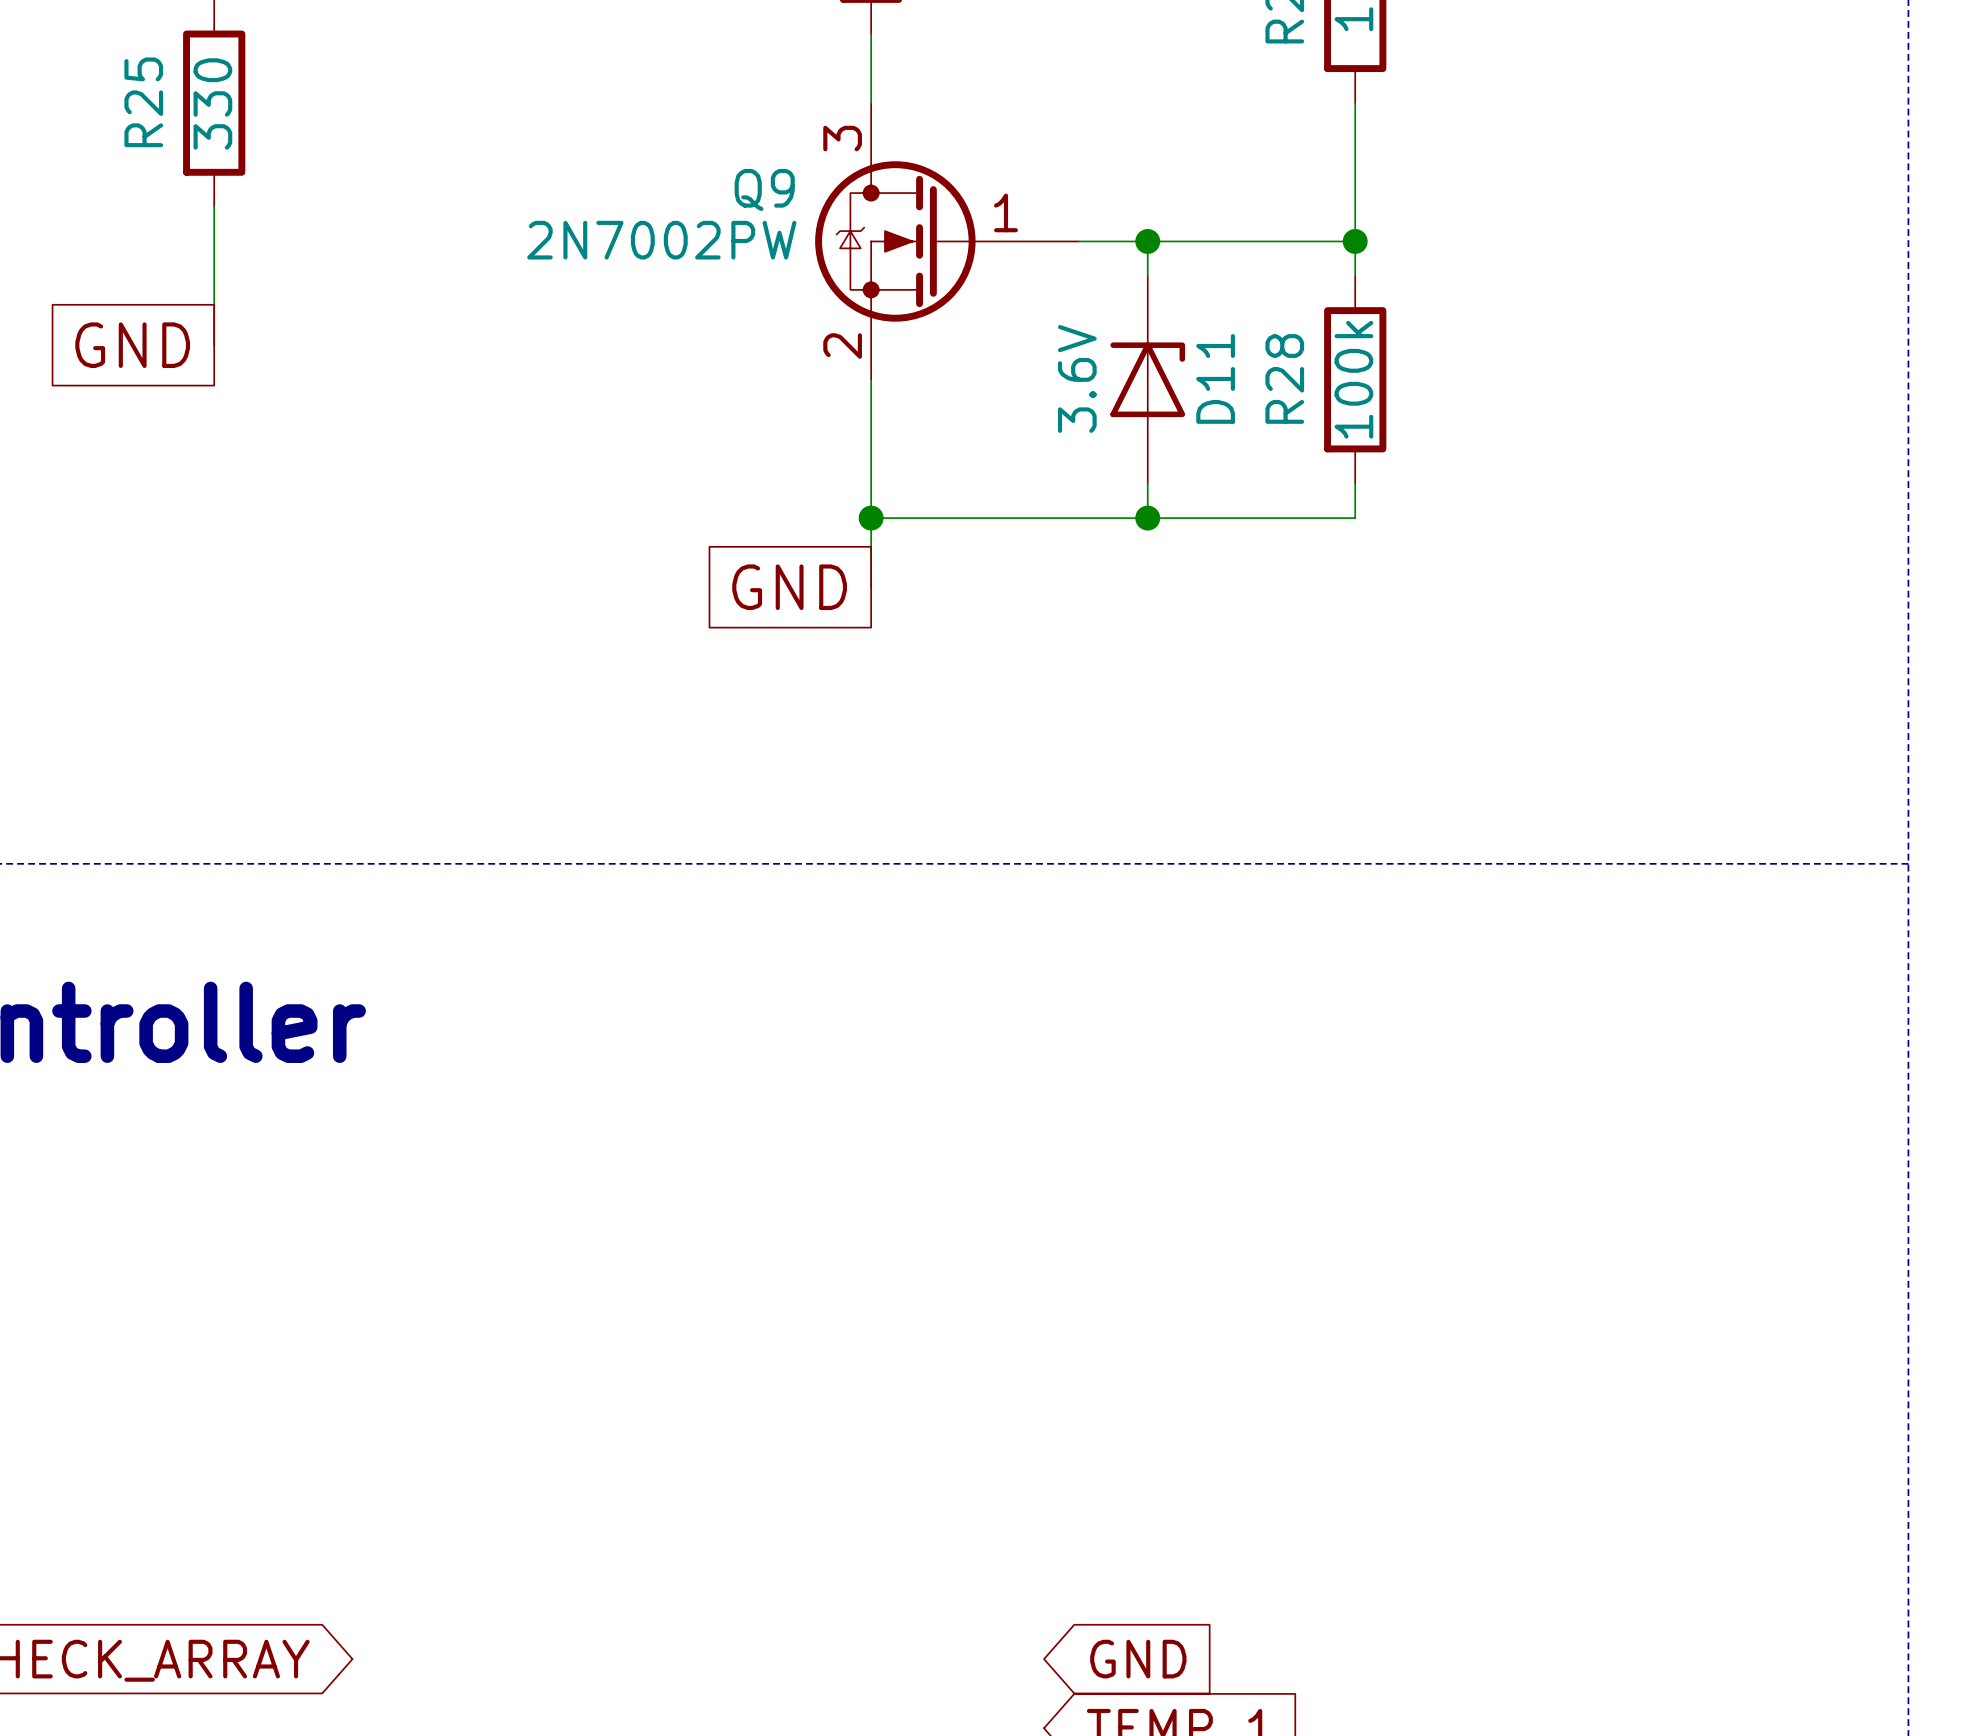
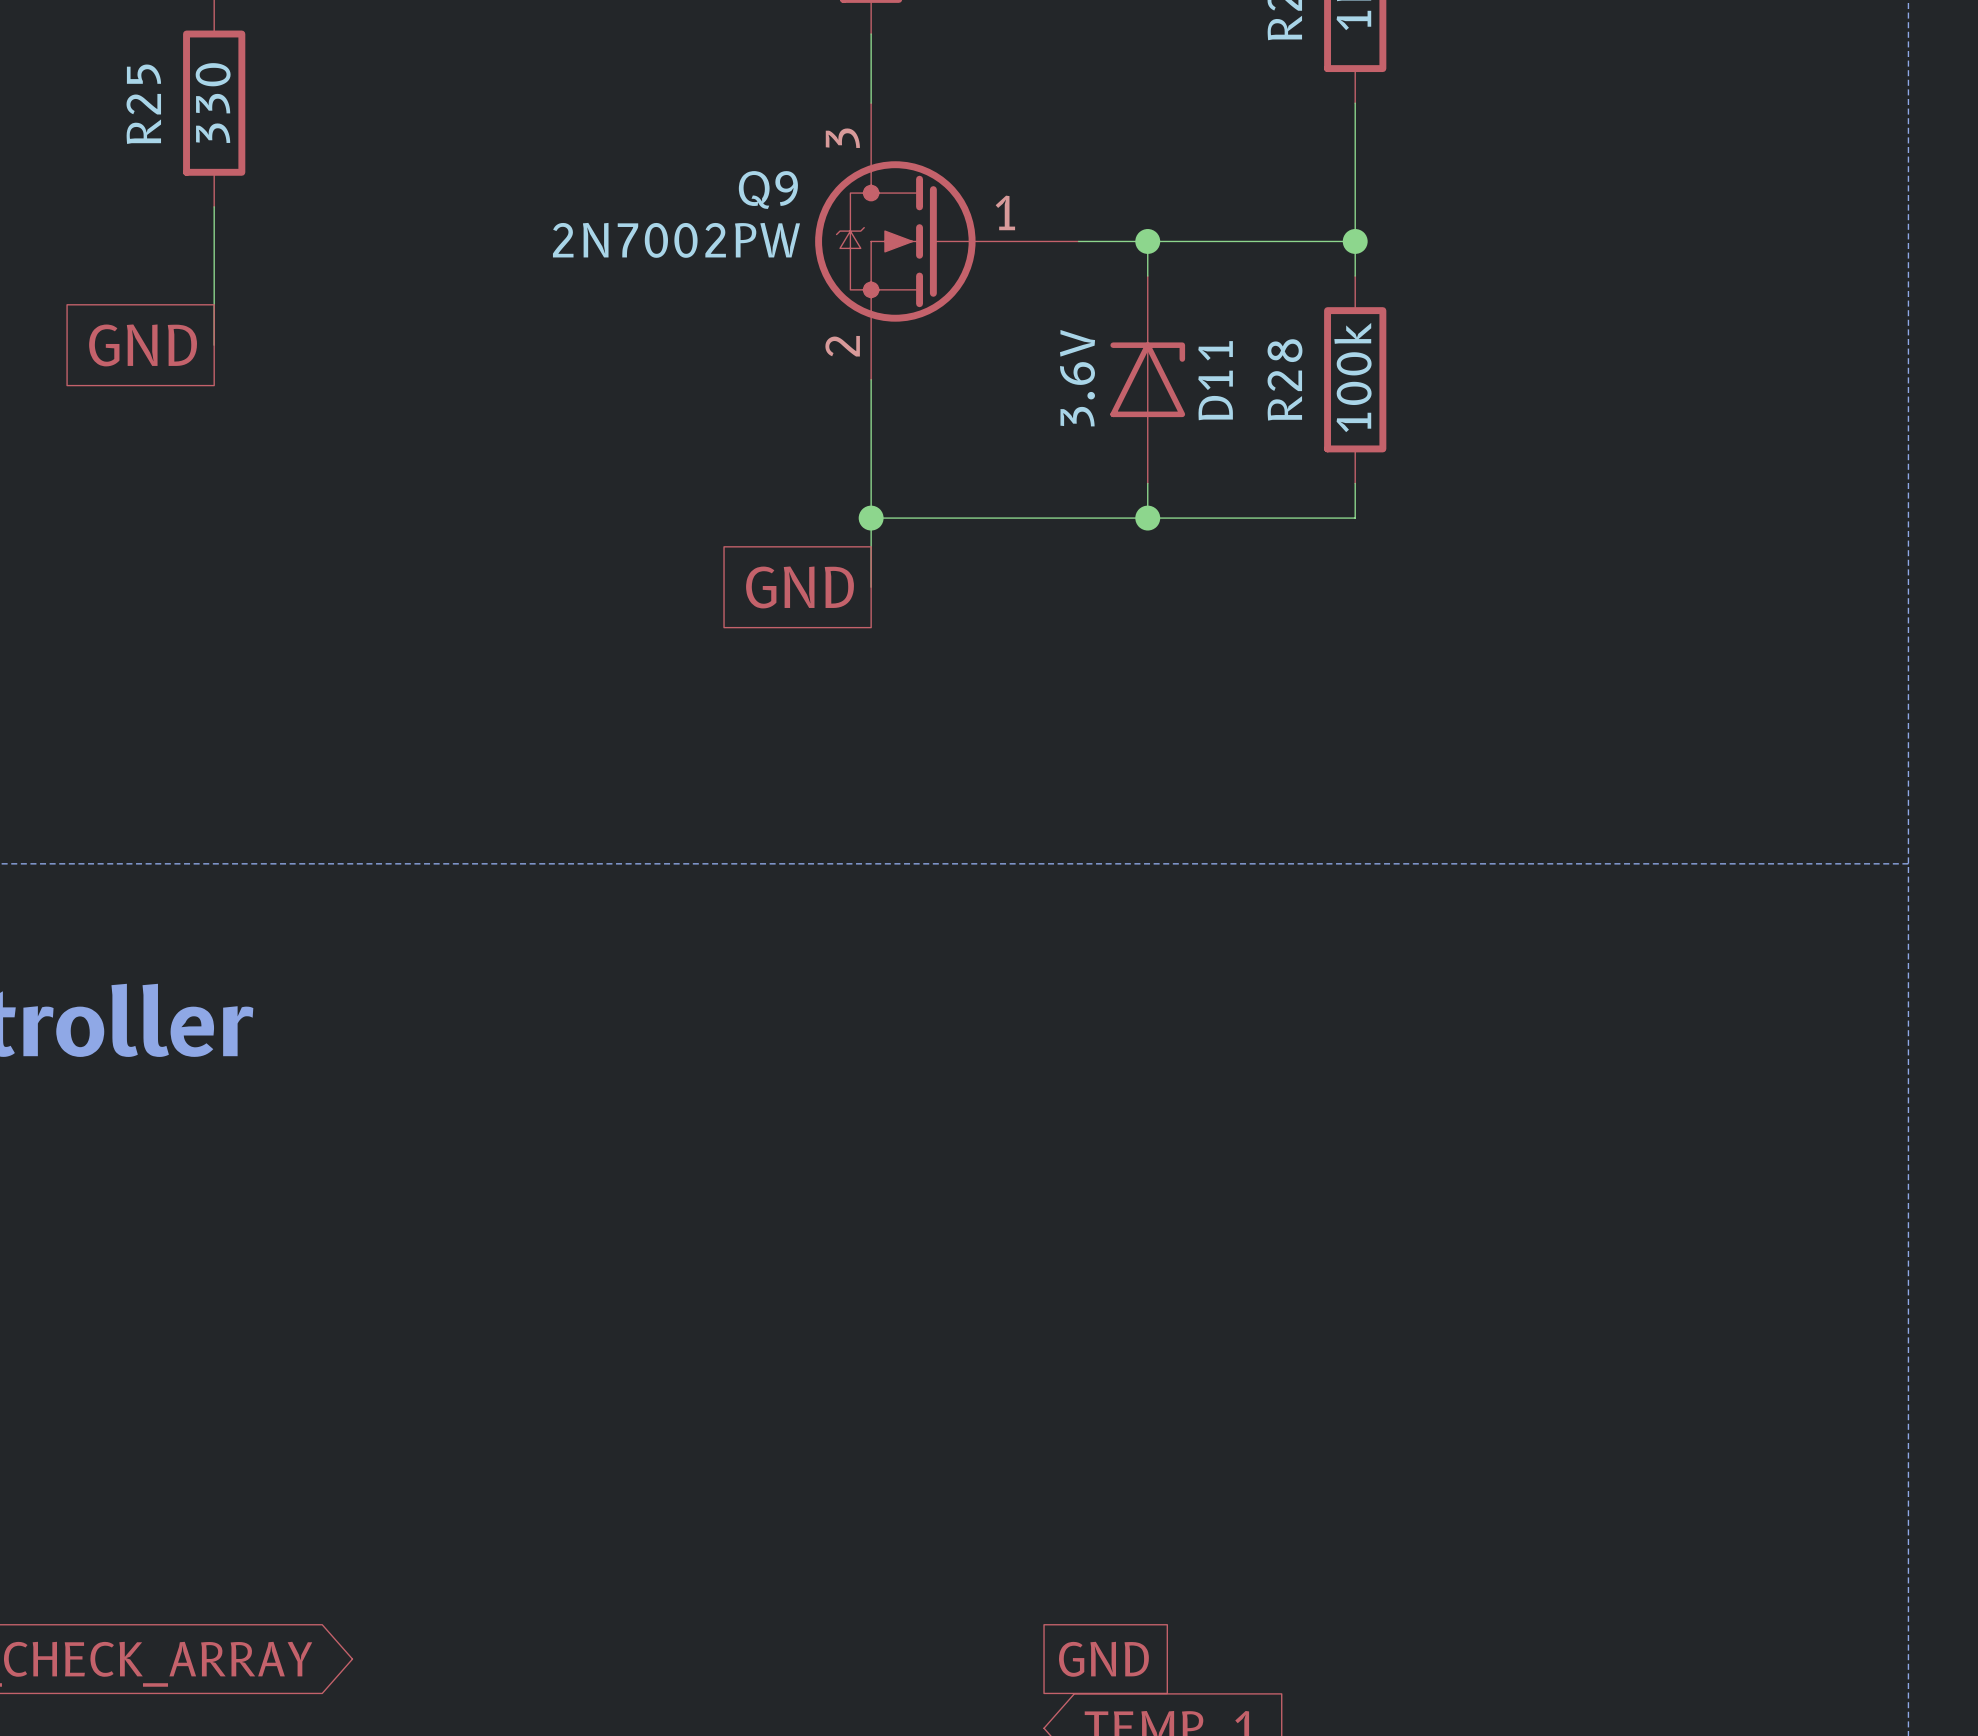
global label shape: input (1138, 1659) -> passive (1103, 1659)

